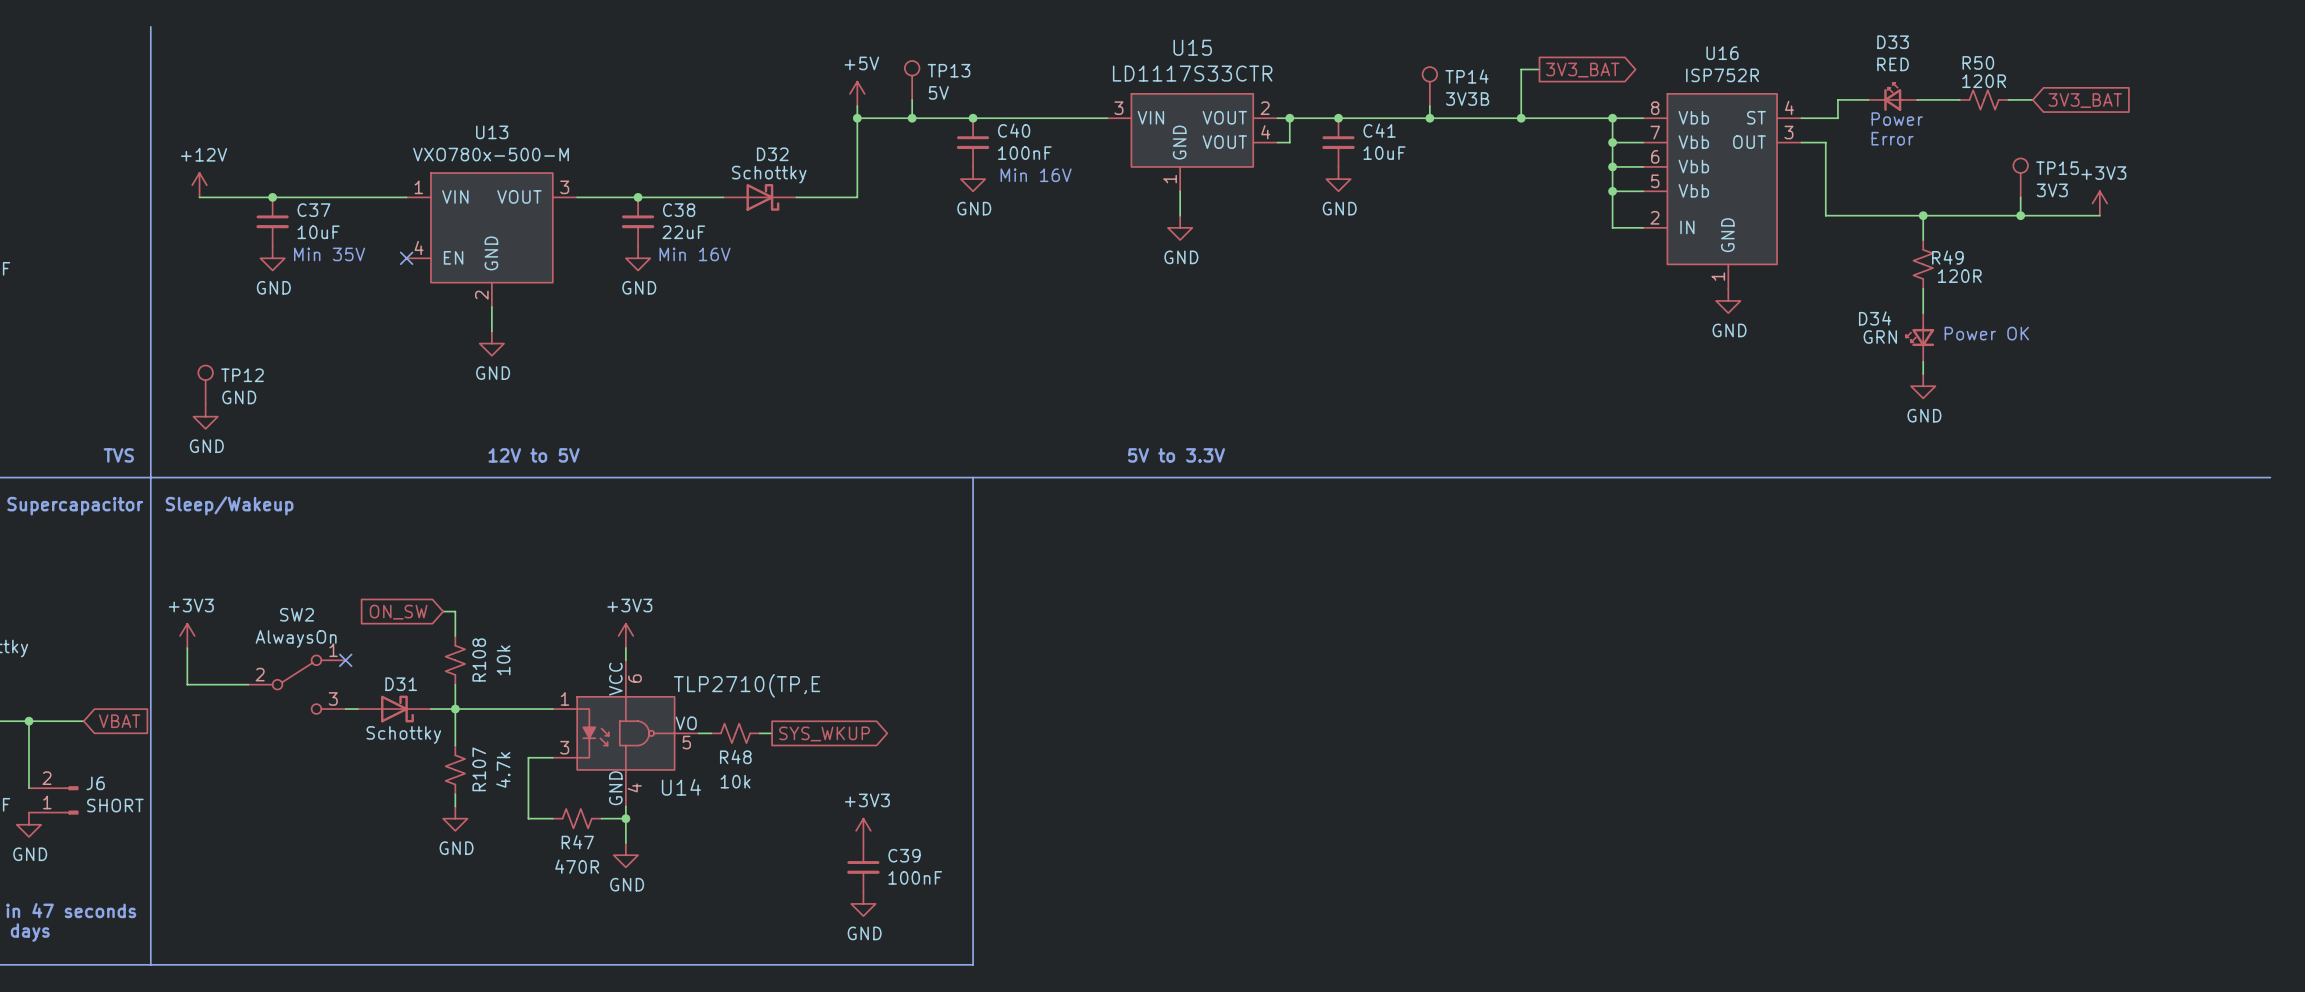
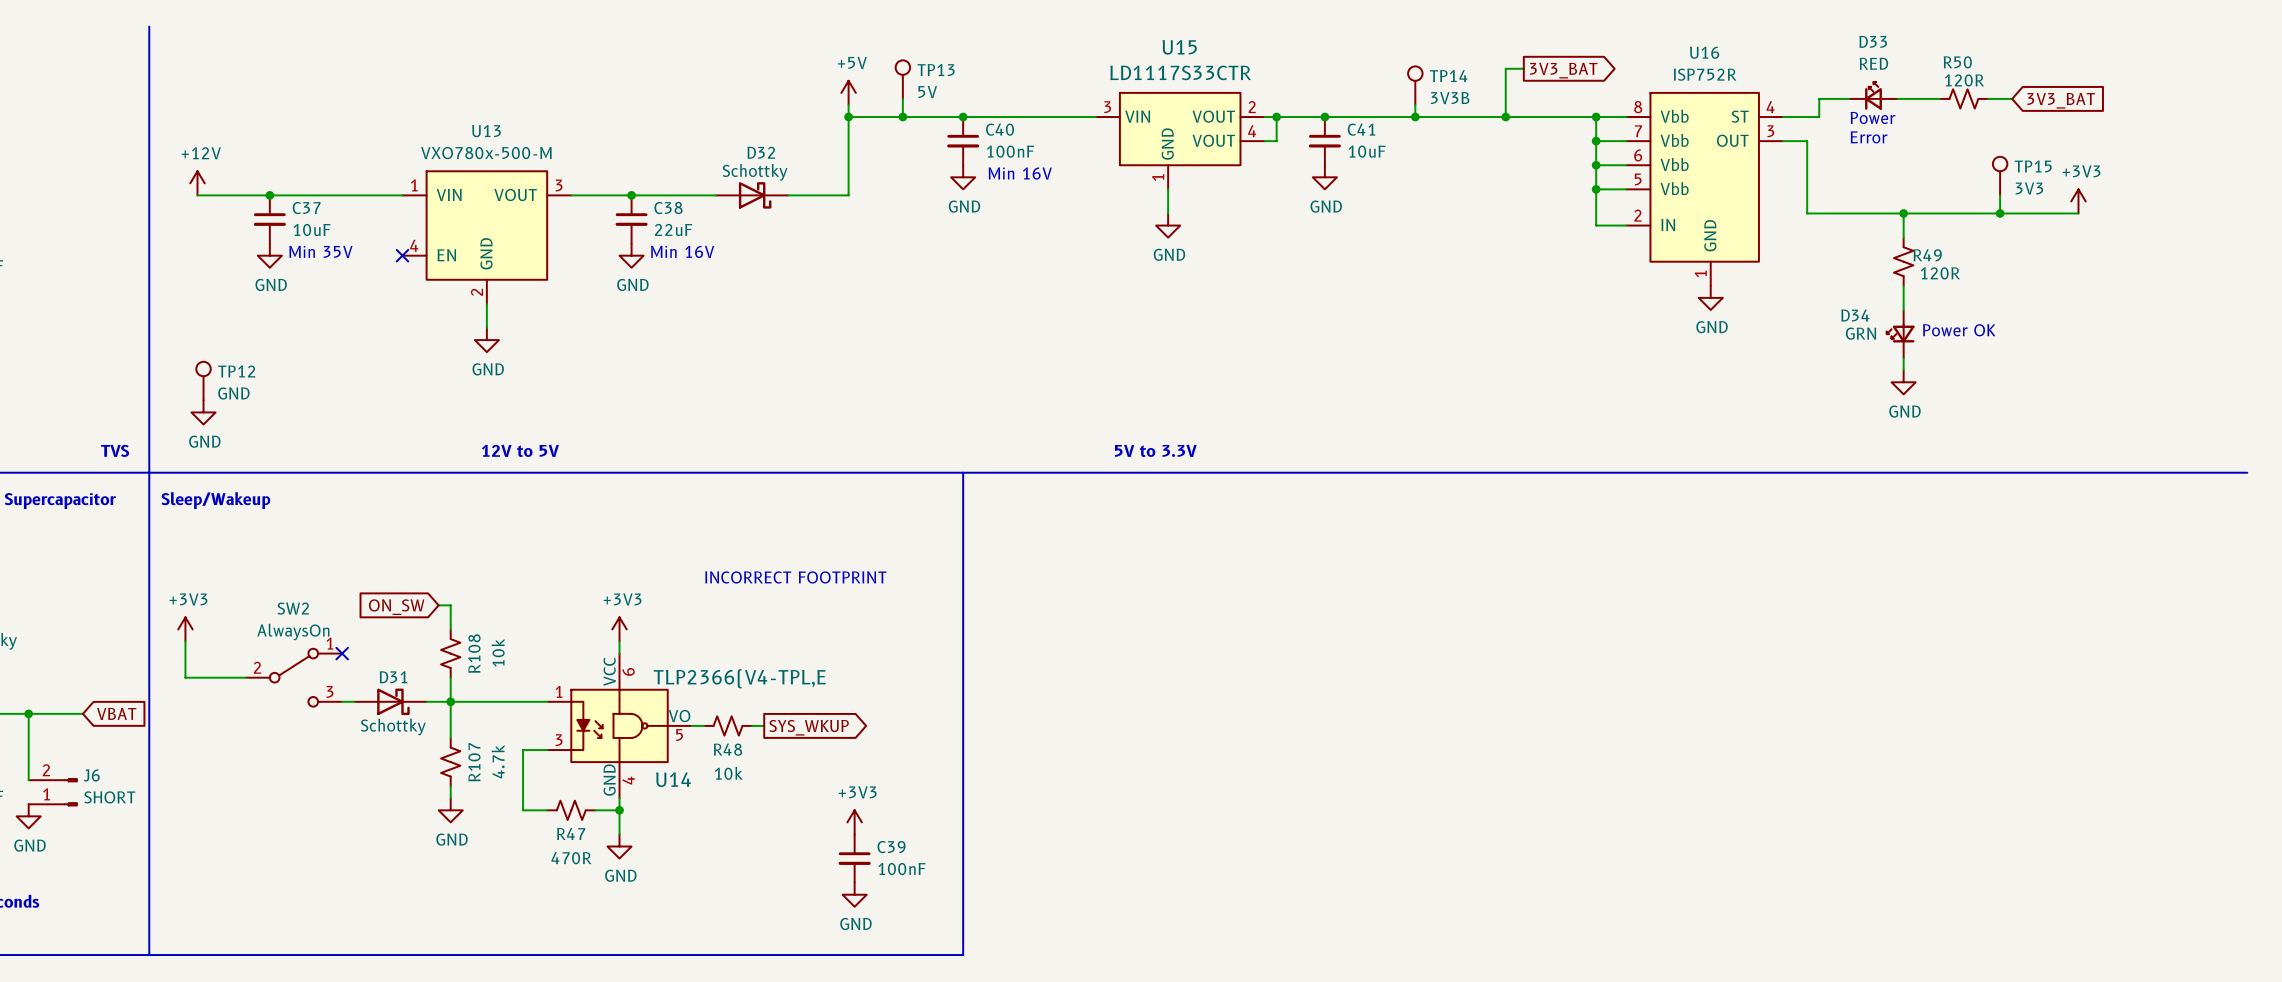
text: none -> INCORRECT FOOTPRINT (795, 577)
U14 value: TLP2710(TP,E (747, 685) -> TLP2366(V4-TPL,E (739, 678)

